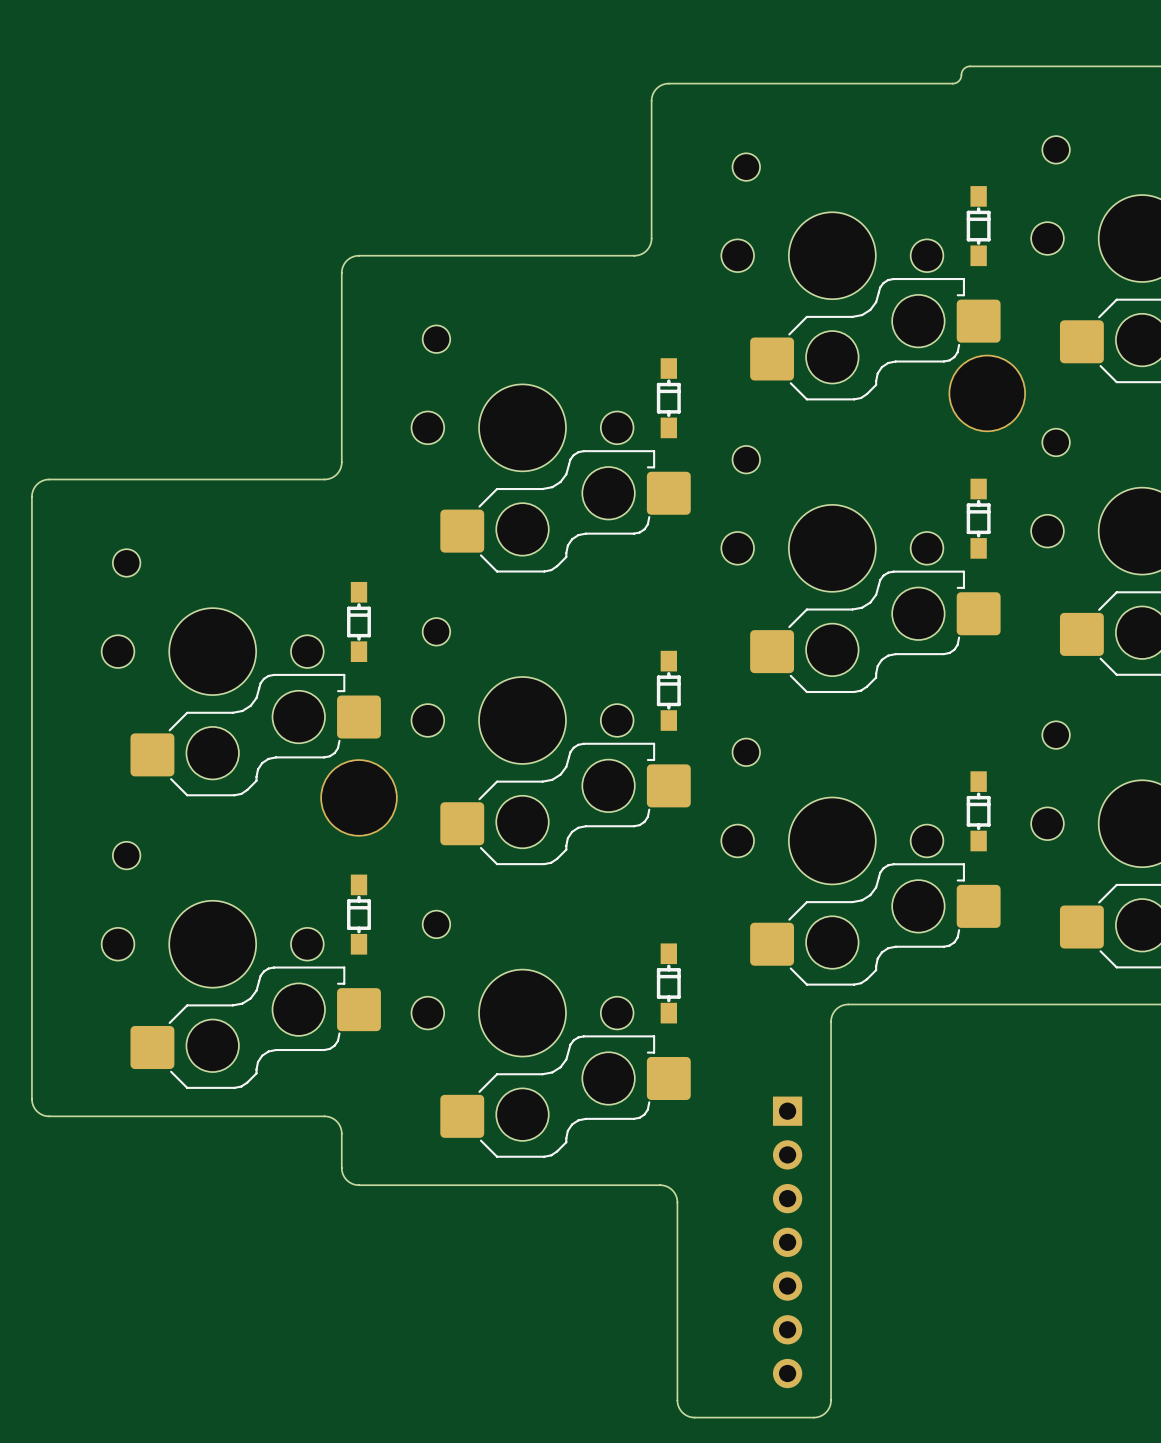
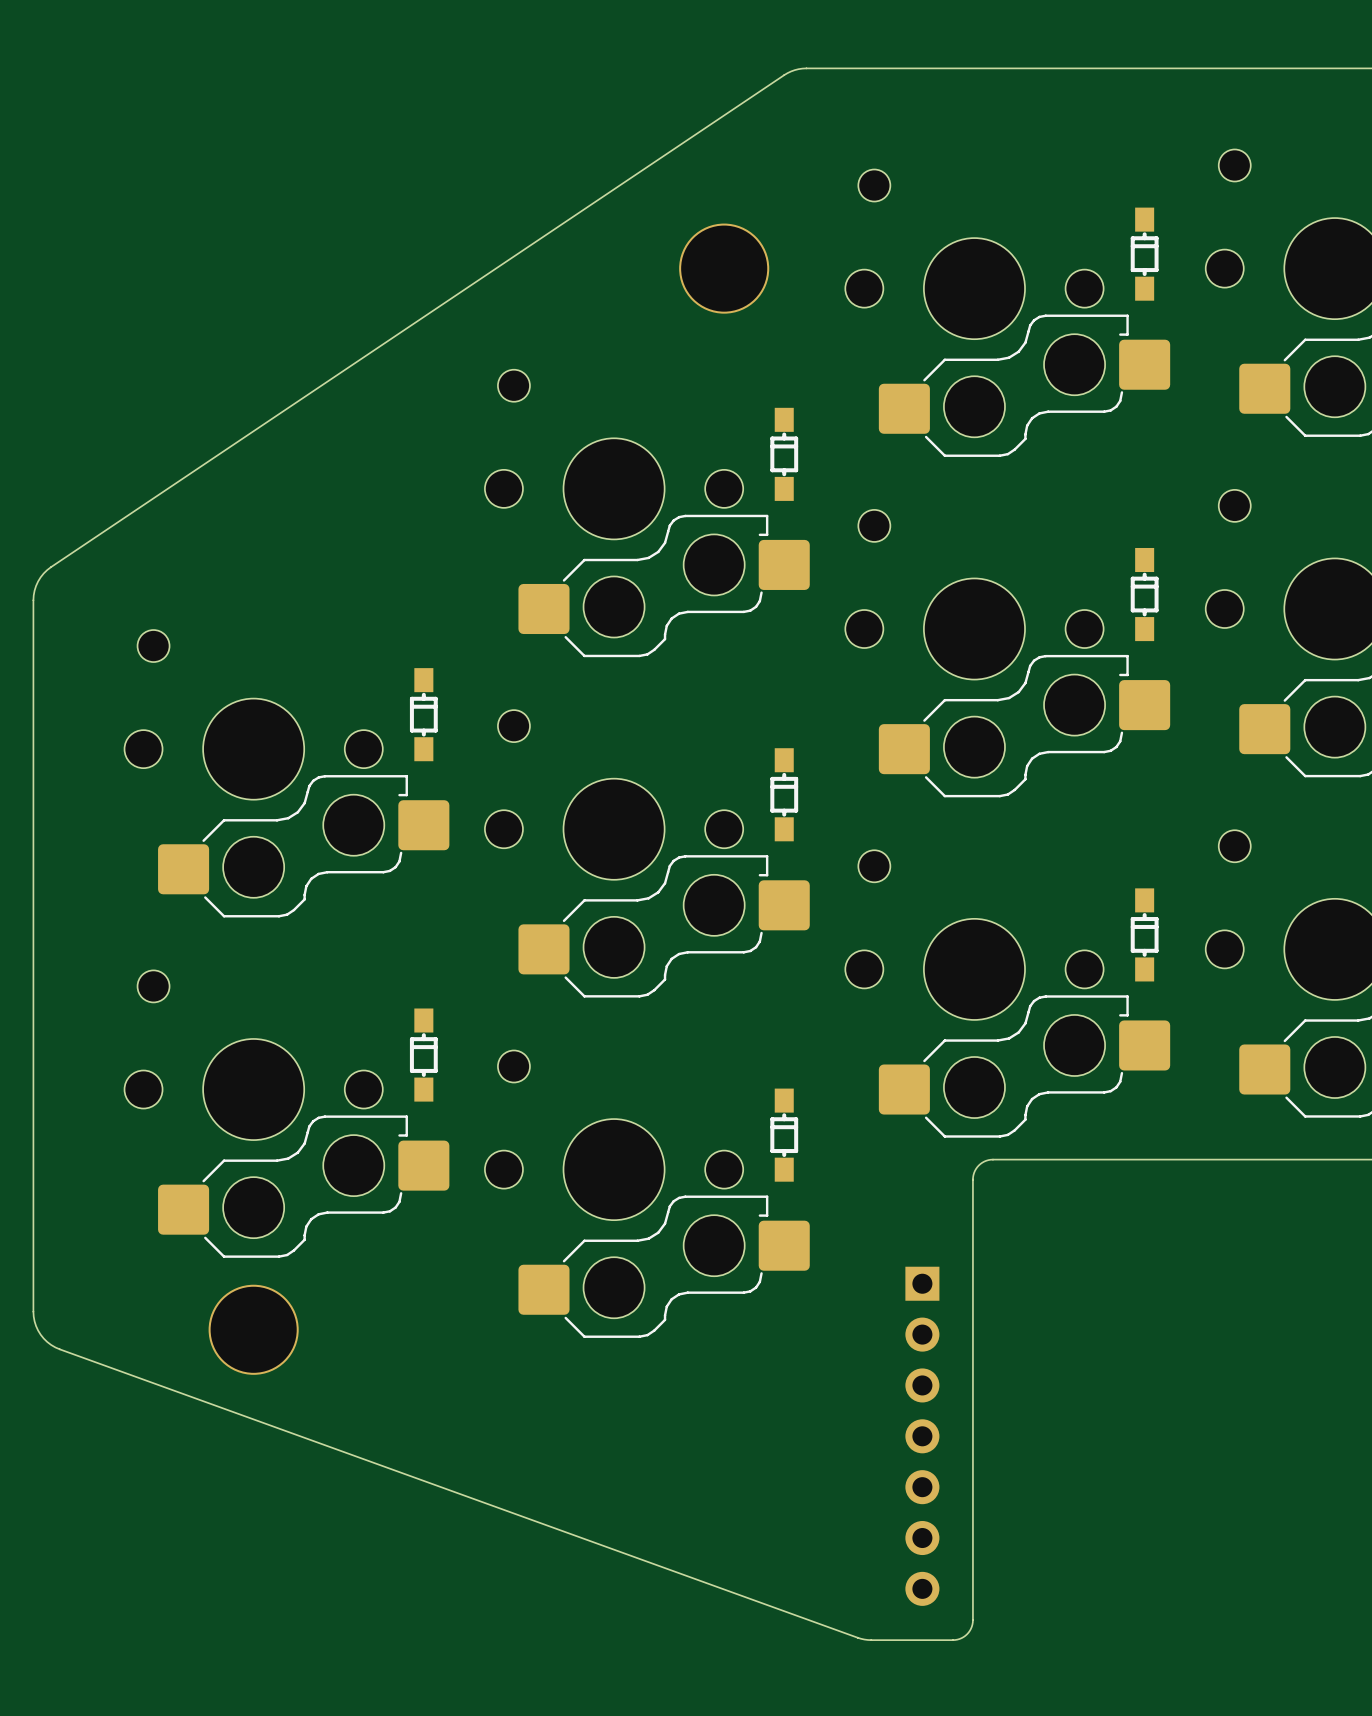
board edge: (970, 66) (963, 68) (959, 80) (952, 83) (668, 83) (661, 85) (654, 91) (651, 98) (651, 238) (648, 247) (643, 253) (634, 255) (358, 255) (351, 257) (345, 262) (341, 272) (341, 462) (339, 471) (333, 476) (324, 479) (47, 479) (36, 484) (32, 494) (31, 1099) (35, 1109) (41, 1114) (49, 1116) (328, 1116) (336, 1121) (341, 1129) (343, 1175) (348, 1181) (357, 1185) (660, 1185) (667, 1186) (674, 1193) (677, 1202) (678, 1406) (683, 1413) (690, 1417) (743, 1417) -> (1134, 68) (806, 68) (787, 73) (51, 567) (38, 581) (33, 595) (33, 1311) (36, 1326) (43, 1338) (59, 1349) (857, 1637) (871, 1640)
part: none -> (724, 268)
part: (987, 393) -> none
part: (358, 797) -> none
part: none -> (253, 1329)

